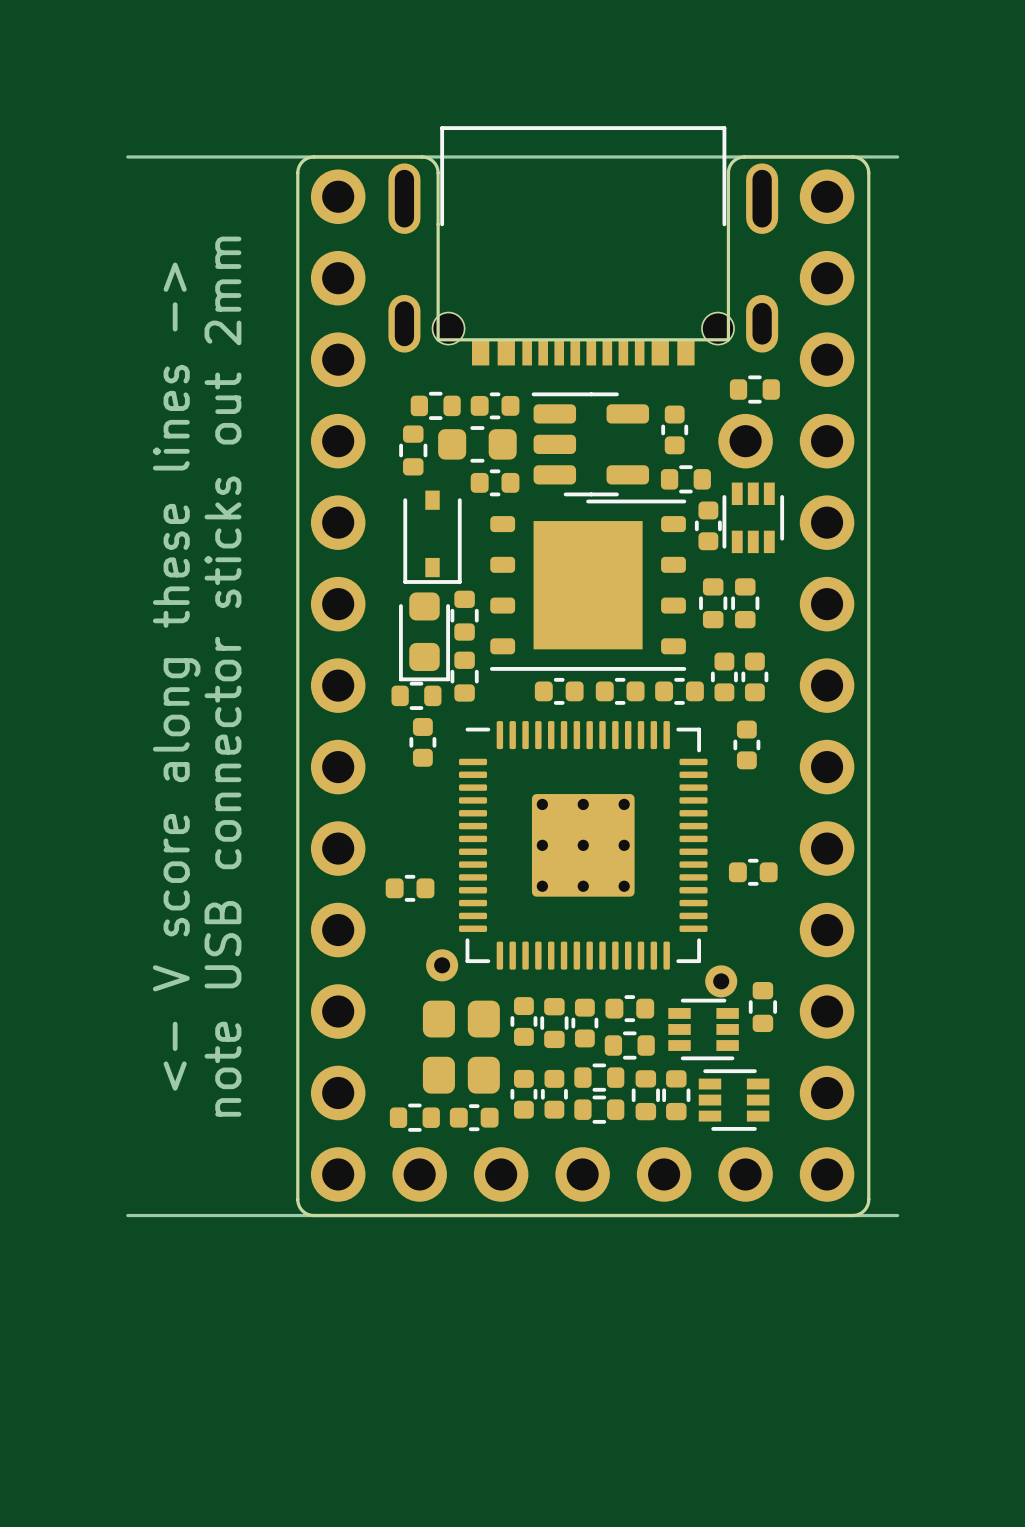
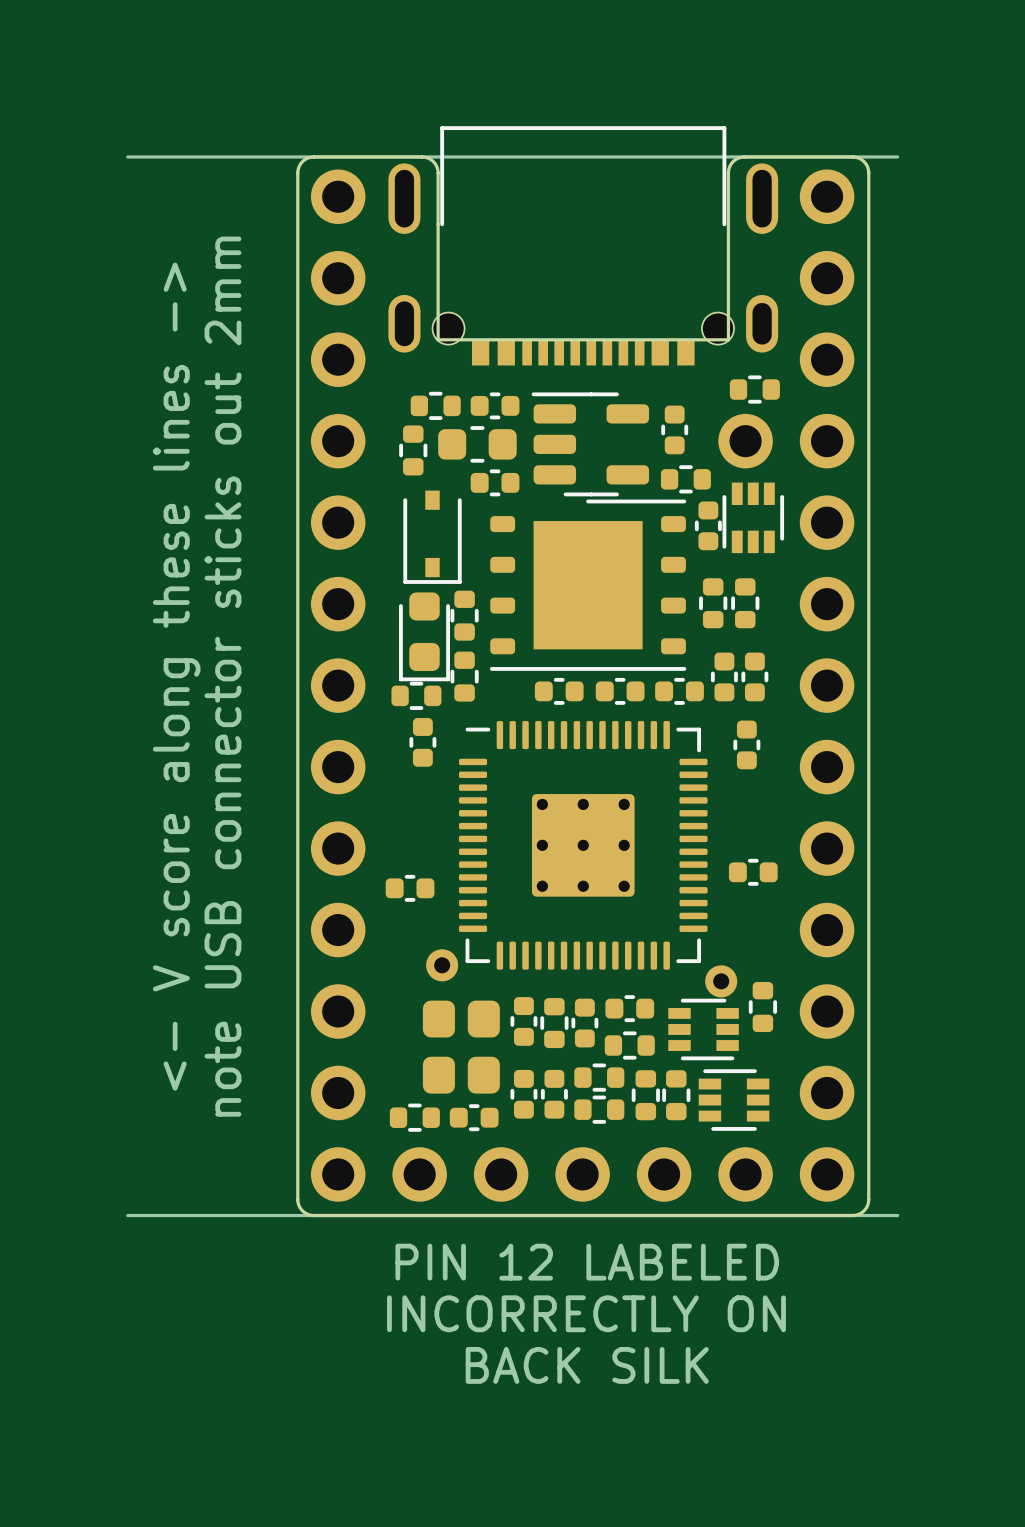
text: none -> PIN 12 LABELED (587, 1262)
text: none -> INCORRECTLY ON (586, 1313)
text: none -> BACK SILK (587, 1365)

